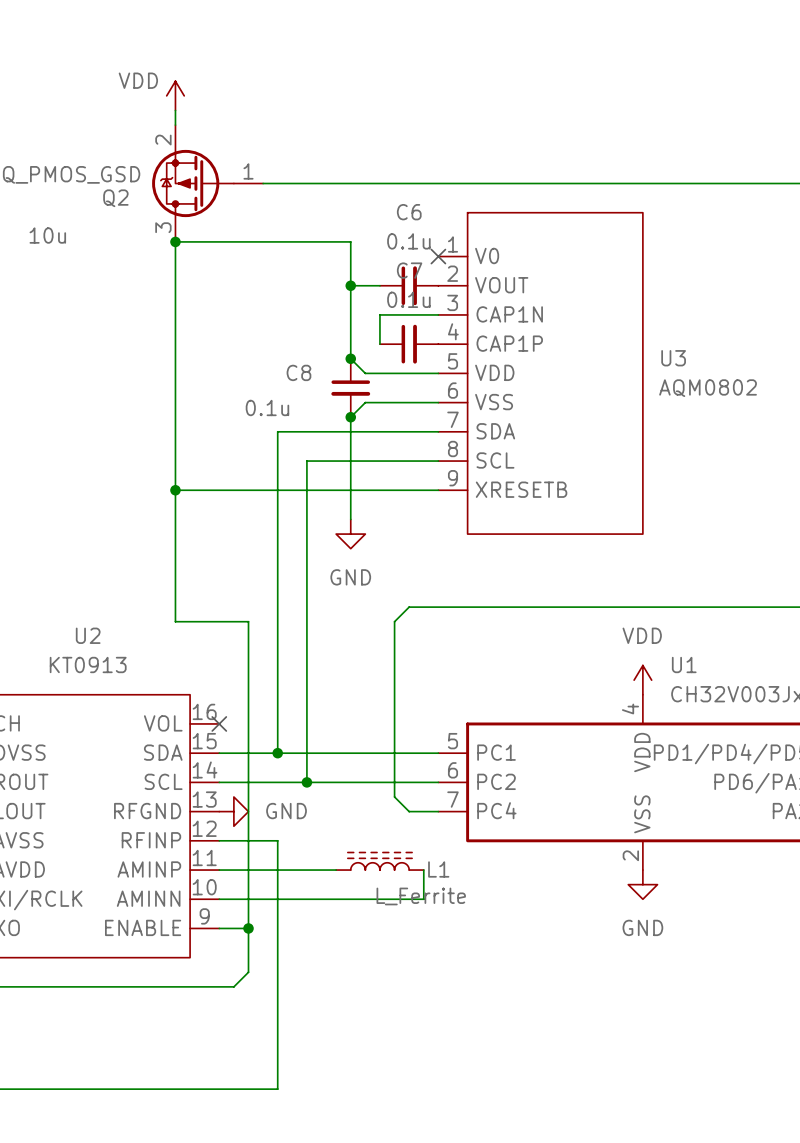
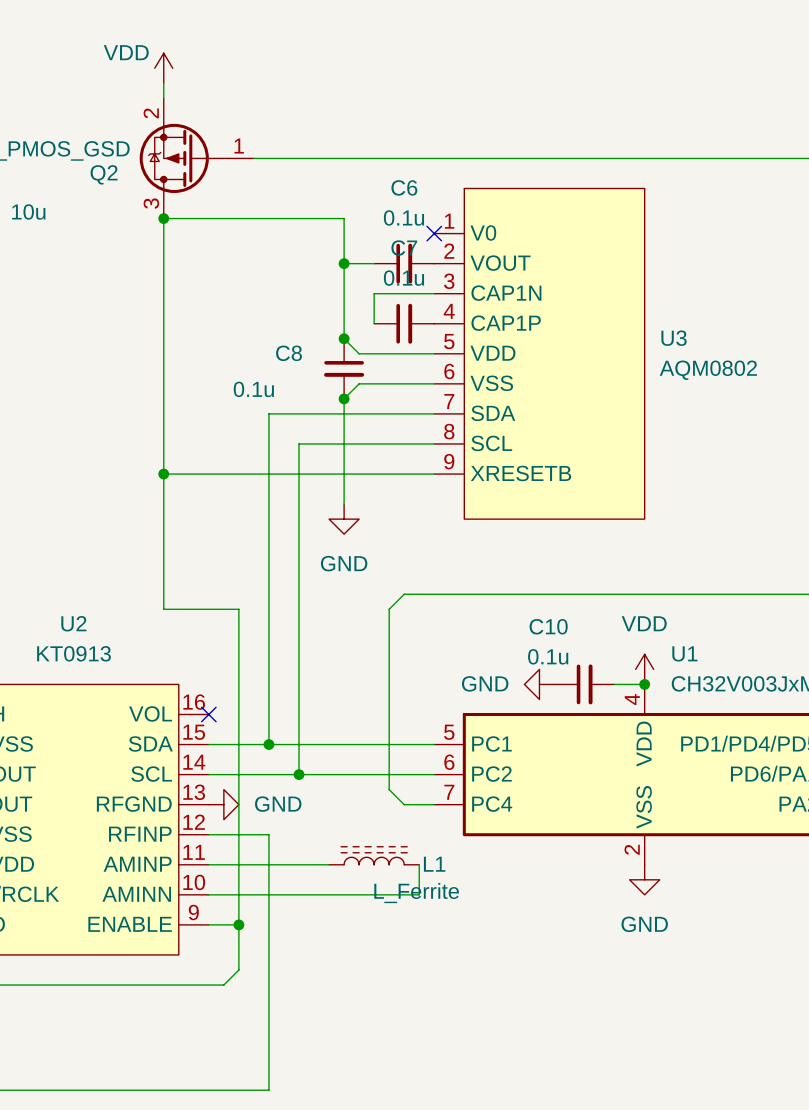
power symbol: none -> GND (539, 684)
C10: none -> 0.1u (584, 684)
wire: none -> (614, 684) (644, 684)
junction: none -> (644, 684)

